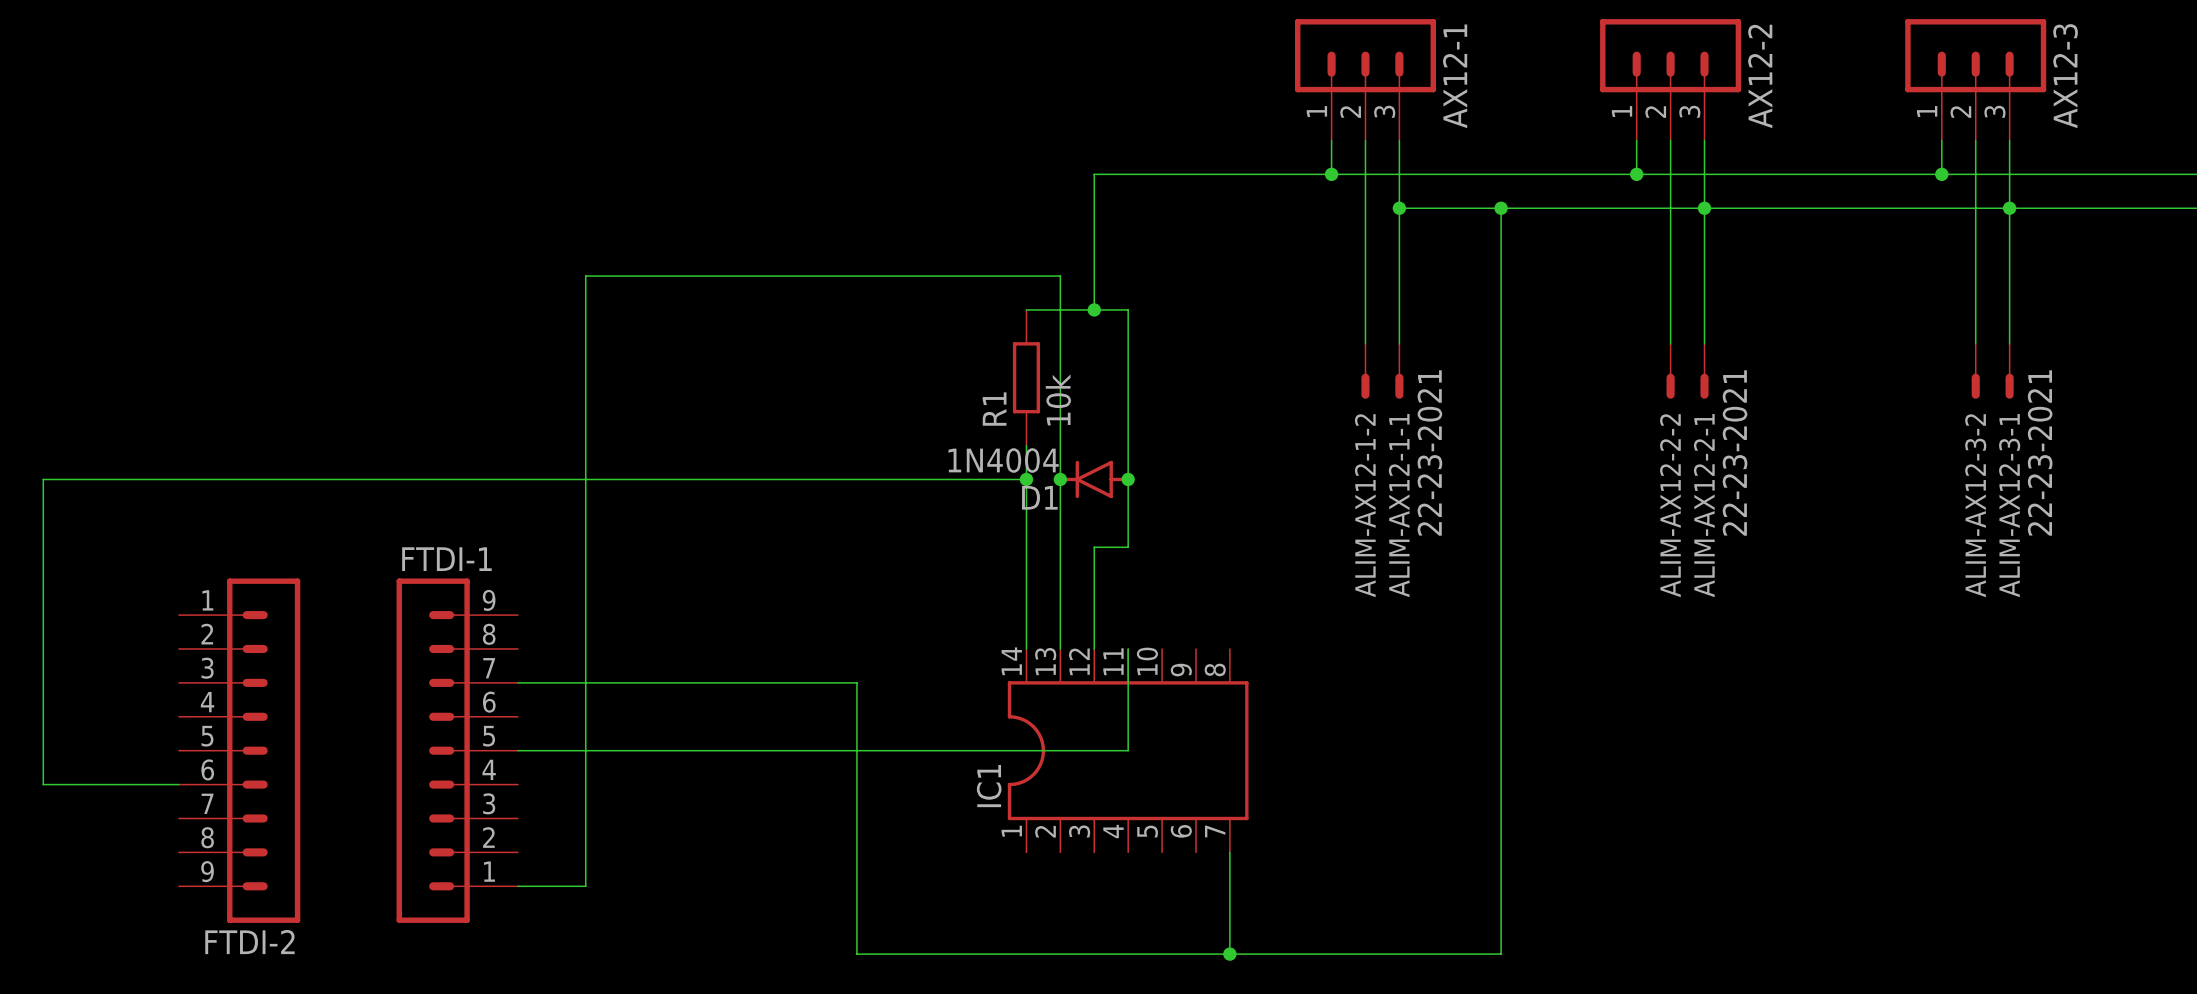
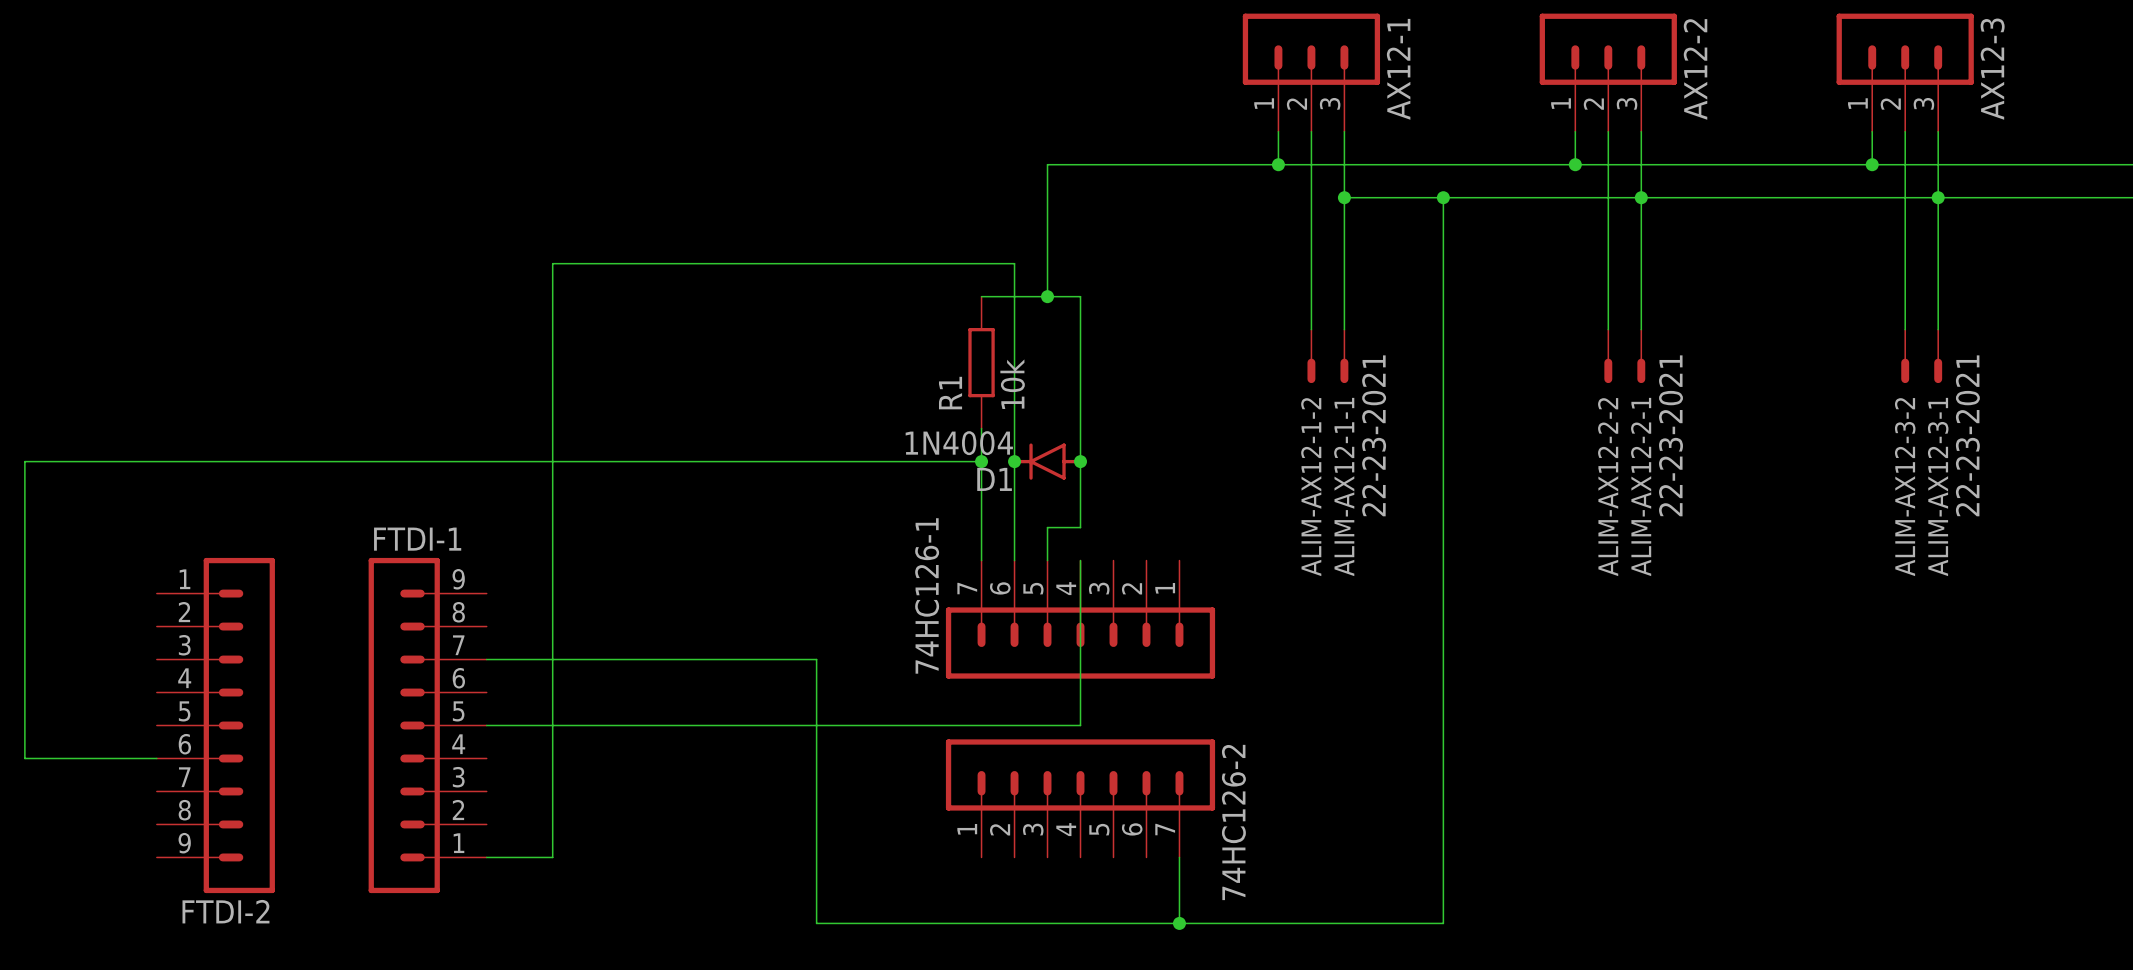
74HC126-1: none -> (1080, 619)
IC1: (1128, 750) -> none
74HC126-2: none -> (1080, 798)

